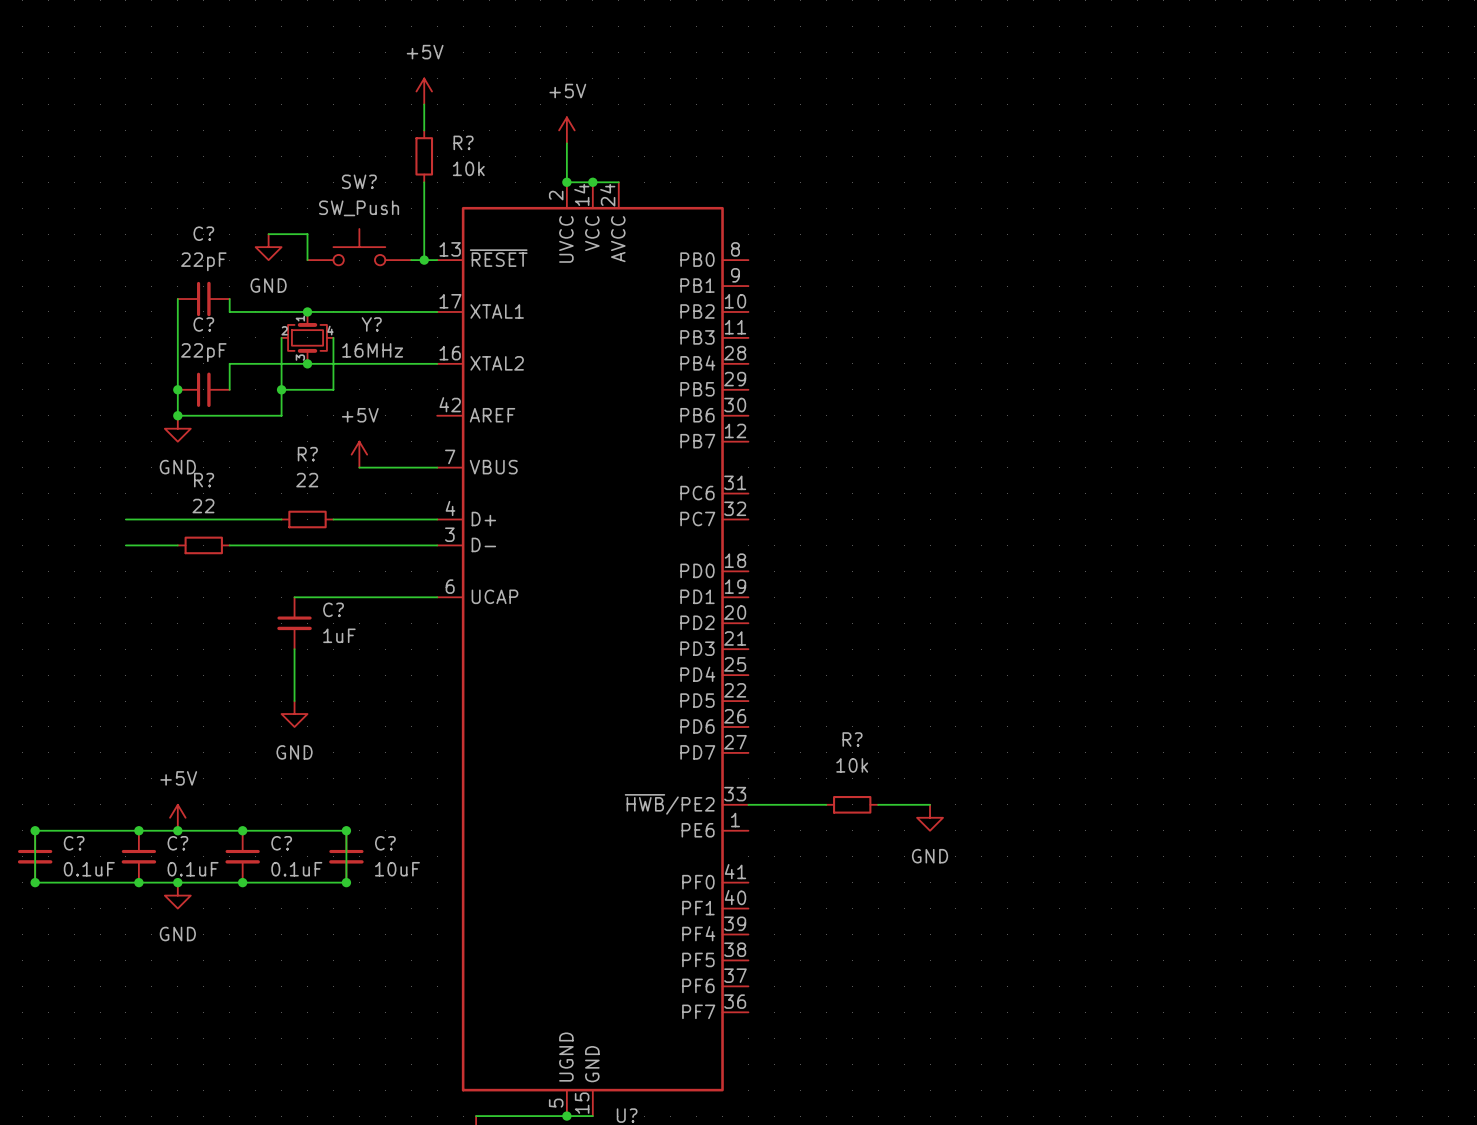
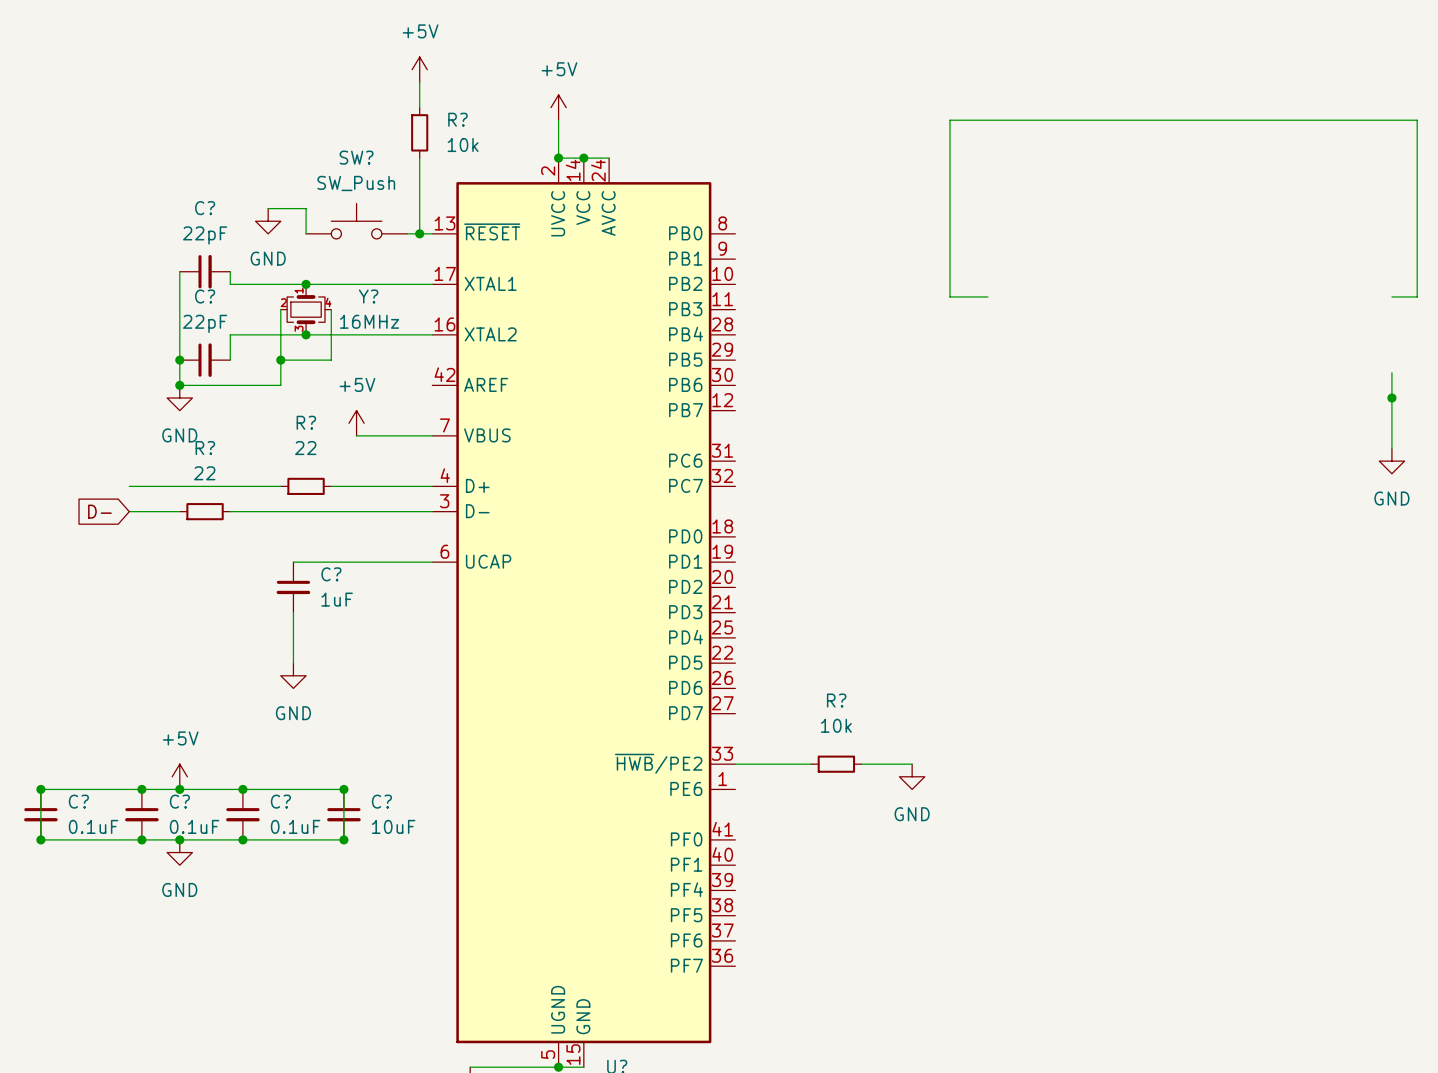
wire: none -> (987, 296) (950, 296) (950, 120) (1417, 120) (1417, 296) (1391, 296)
wire: none -> (1391, 372) (1391, 448)
junction: none -> (1391, 398)
power symbol: none -> GND (1391, 461)
global label: none -> D- (99, 511)

